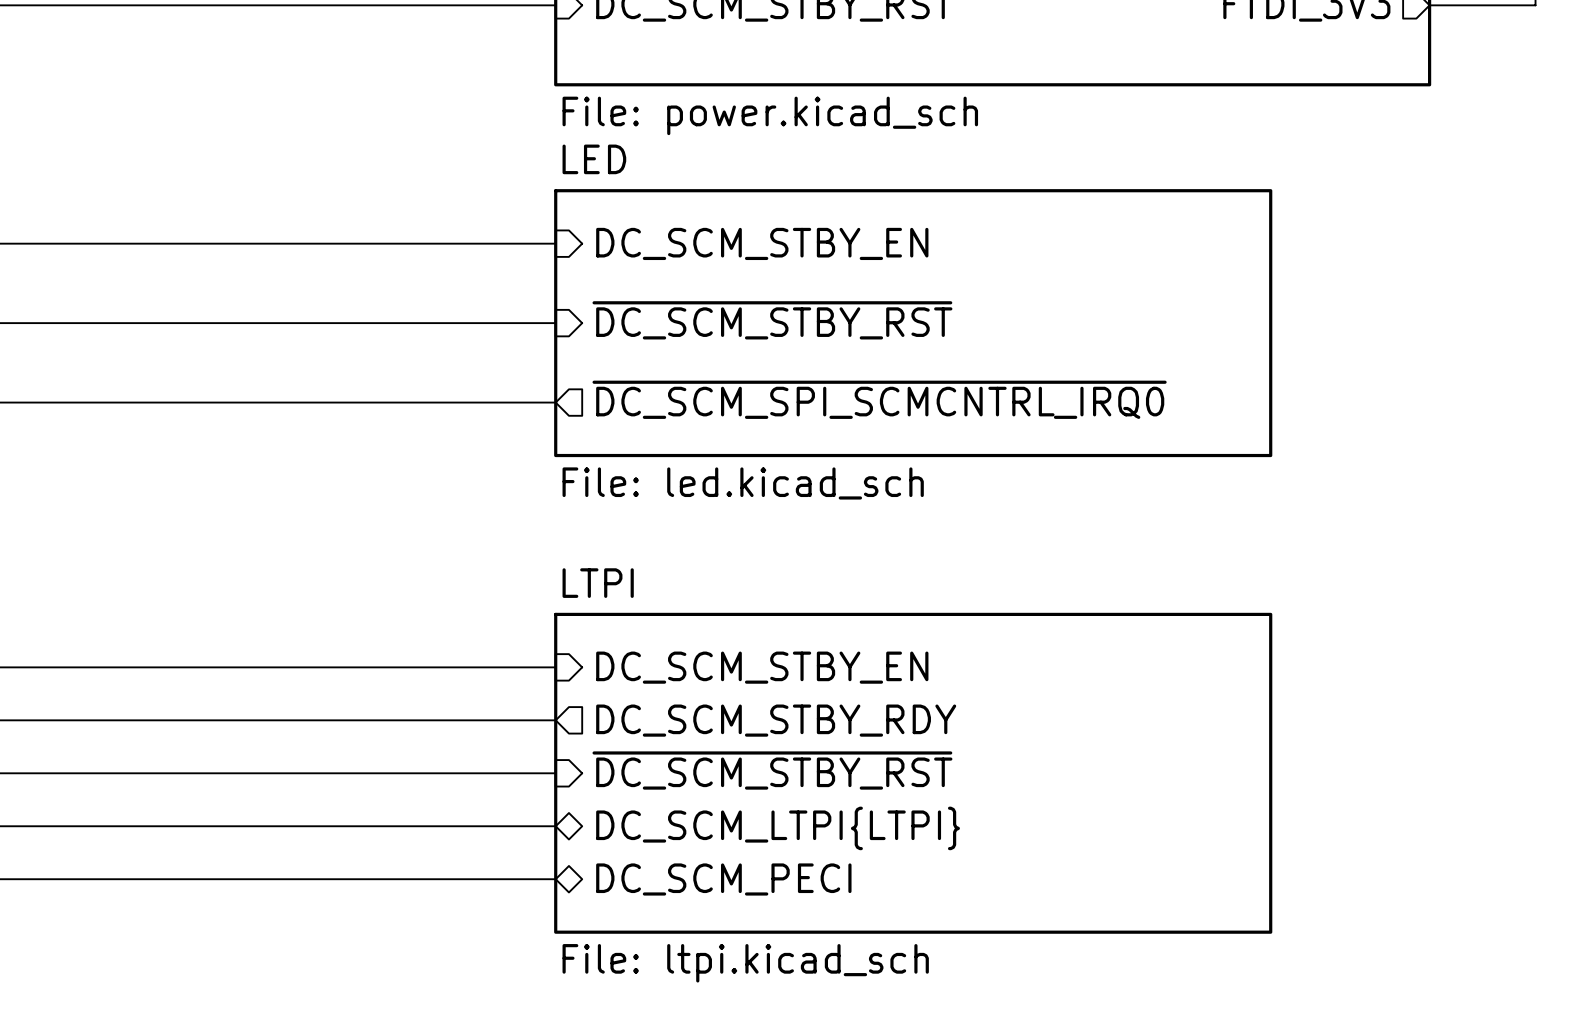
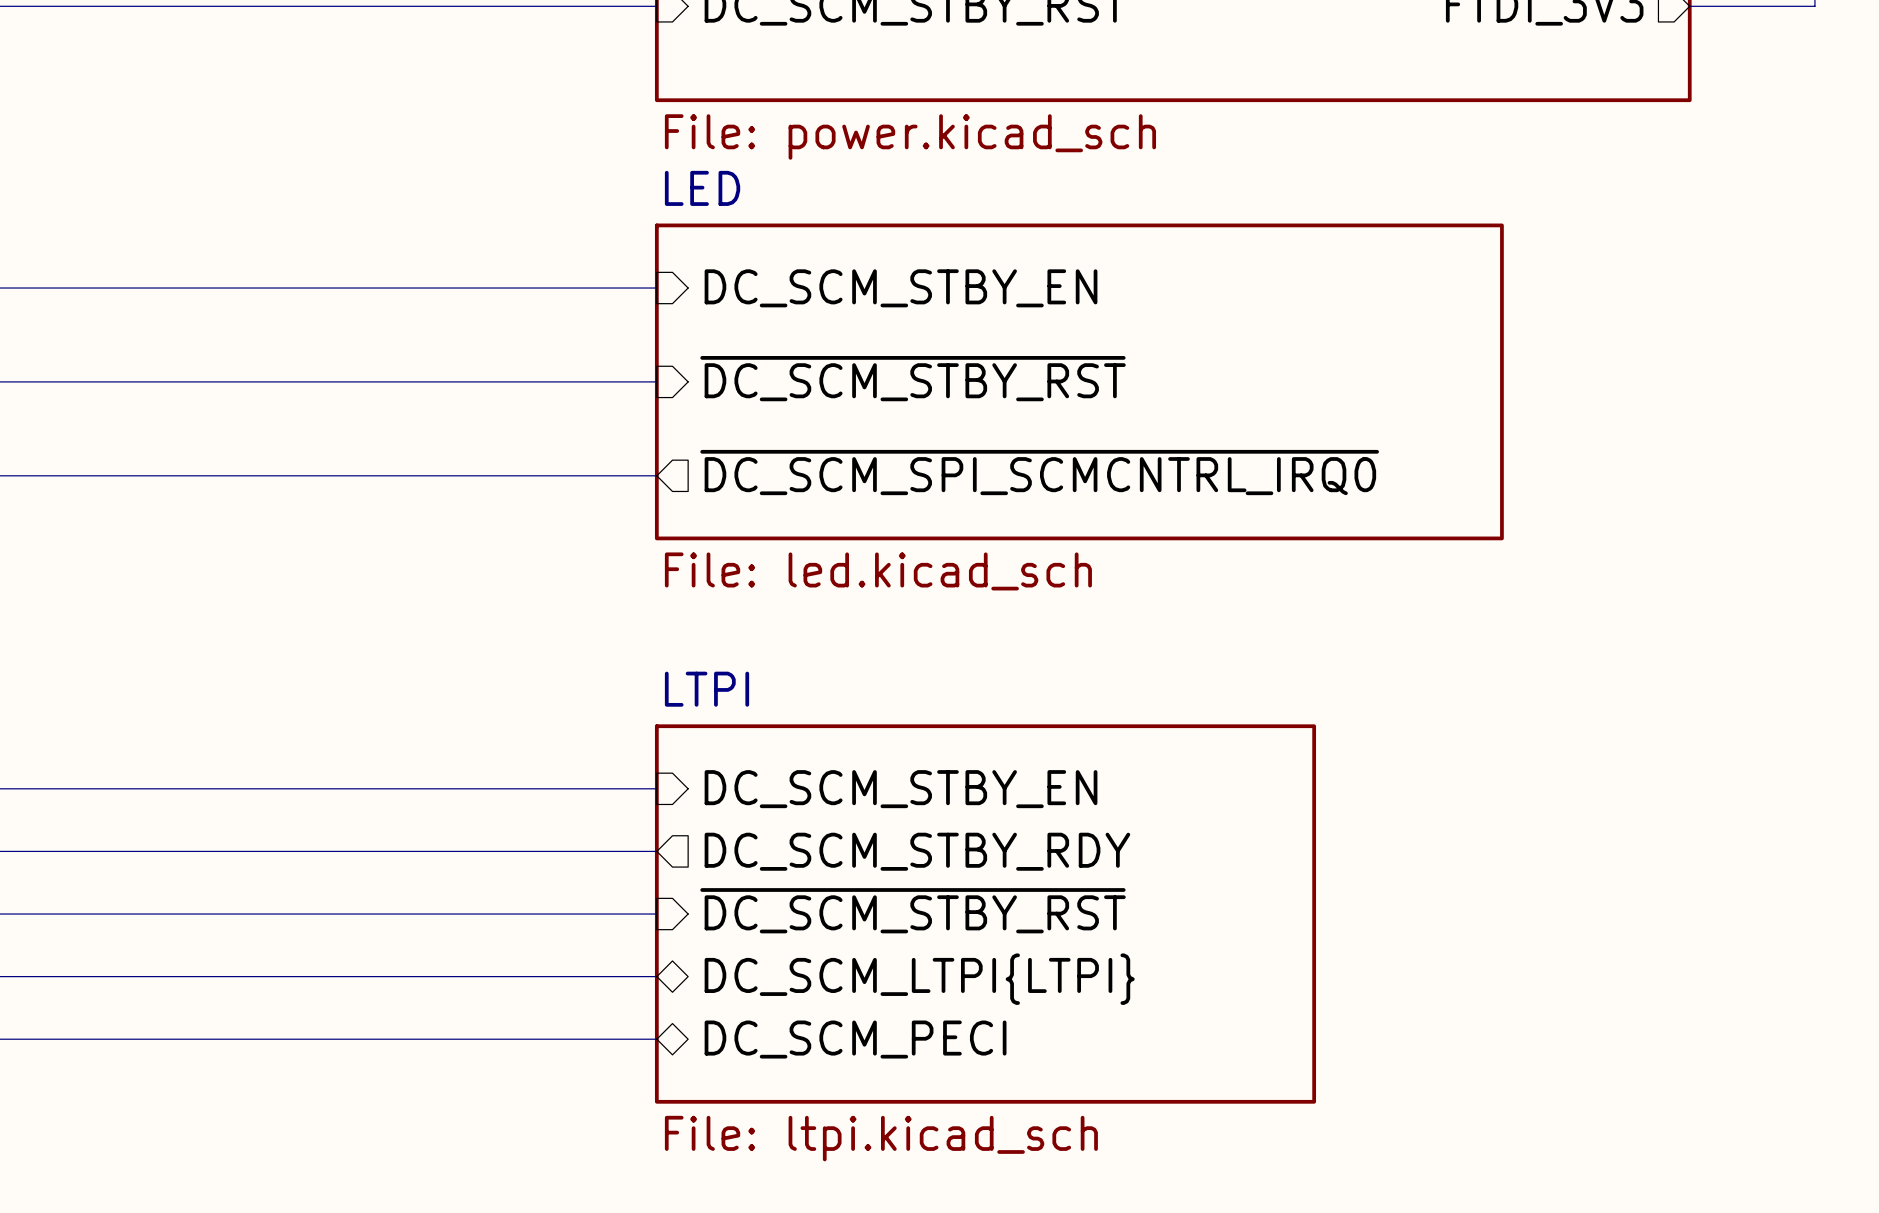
sheet LTPI: none -> File: ltpi.kicad_sch (985, 914)
sheet LTPI: File: ltpi.kicad_sch (913, 773) -> none

